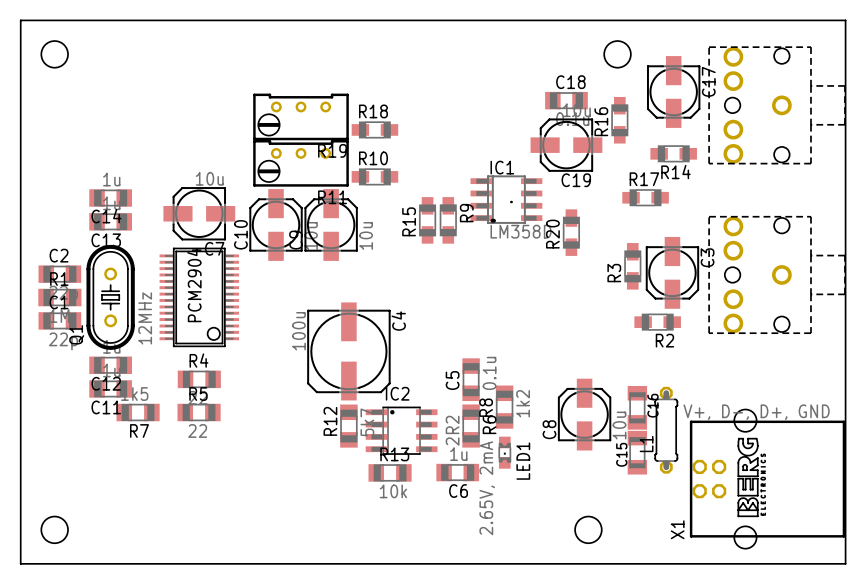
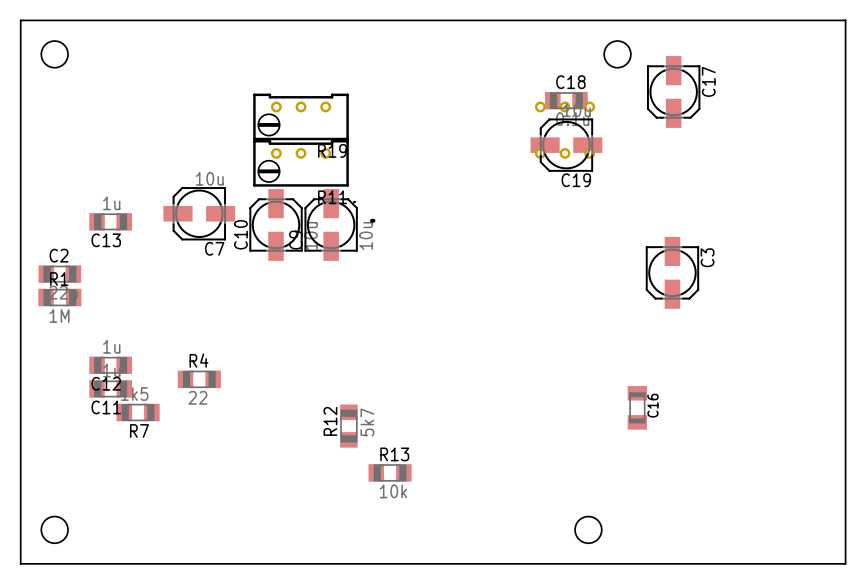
part: (777, 105) -> none
part: none -> (564, 106)
R16: (619, 120) -> none
R18: (374, 129) -> none
part: none -> (564, 153)
R14: (673, 153) -> none
R10: (374, 176) -> none
R17: (645, 197) -> none
C14: 1u (110, 198) -> none
IC1: LM358D (506, 199) -> none
board edge: (511, 202) (511, 202) -> (354, 202) (354, 202)
R15: (427, 220) -> none
R9: (448, 220) -> none
board edge: (492, 220) (493, 220) -> (372, 220) (373, 220)
R20: (571, 232) -> none
R3: (632, 266) -> none
part: (777, 274) -> none
Q1: 12MHz (110, 297) -> none
PCM2904: (199, 297) -> none
C1: 22p (59, 320) -> none
R2: (657, 322) -> none
C4: 100u (348, 351) -> none
C5: 0.1u (471, 379) -> none
R8: 1k2 (504, 407) -> none
R5: 22 (199, 412) -> none
C8: 10u (584, 414) -> none
R6: 2R2 (471, 426) -> none
IC2: (401, 430) -> none
L1: (666, 430) -> none
LED1: 2.65V, 2mA (504, 452) -> none
C15: (637, 452) -> none
C6: 1u (457, 472) -> none
X1: V+, D-, D+, GND (767, 479) -> none

